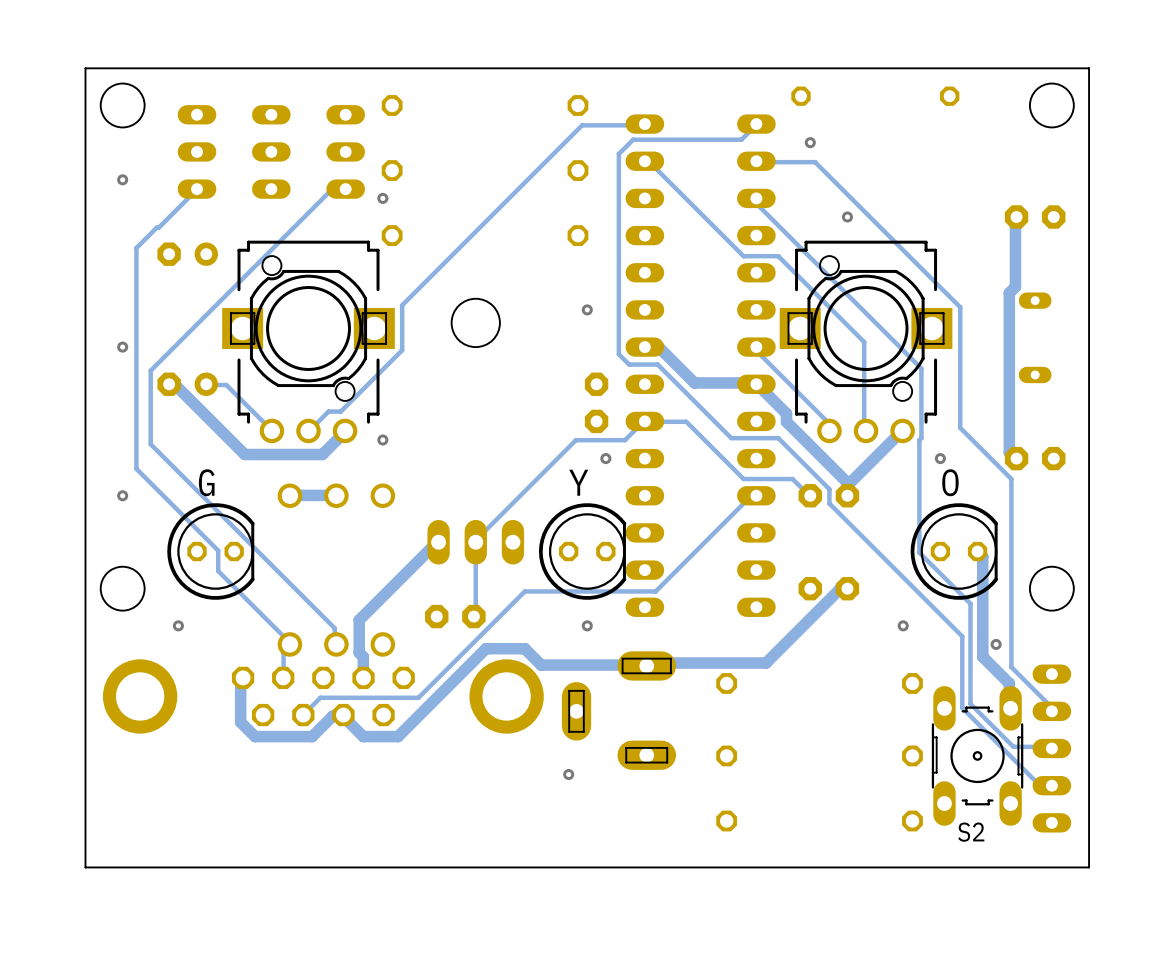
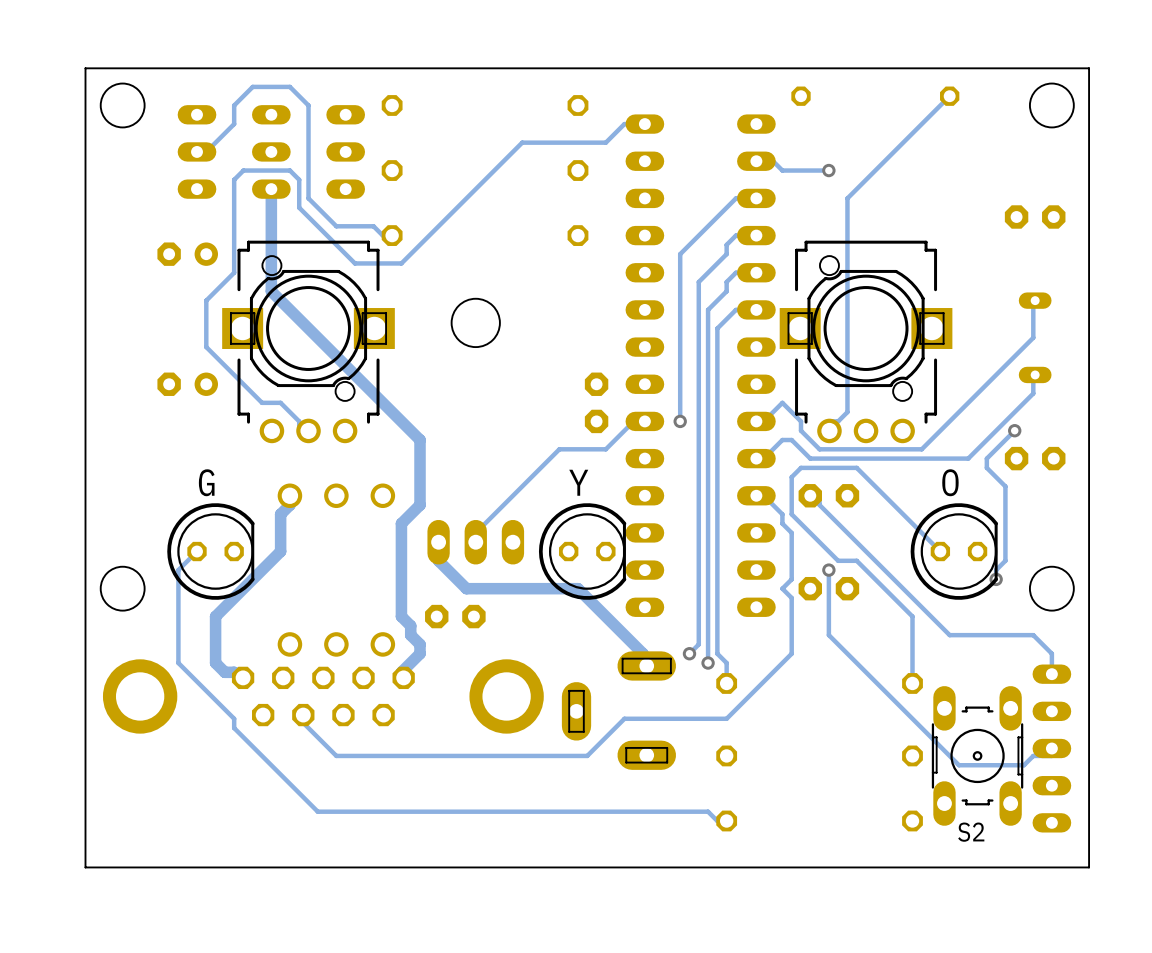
track: (644, 124) (582, 125) (402, 305) (402, 350) (340, 411) (328, 411) (308, 430) -> (644, 124) (624, 124) (605, 142) (522, 142) (401, 263) (354, 263) (299, 207) (299, 179) (289, 170) (243, 170) (234, 179) (234, 272) (206, 300) (206, 347) (262, 402) (280, 402) (299, 421) (299, 430) (308, 440) (308, 430)
track: (756, 124) (741, 139) (633, 139) (618, 153) (618, 354) (629, 364) (657, 364) (731, 438) (778, 438) (829, 489) (829, 503) (962, 636) (962, 707) (1039, 785) (1051, 785) -> none
via: (810, 142) -> none
track: none -> (197, 151) (206, 151) (234, 124) (234, 105) (252, 86) (289, 86) (308, 105) (308, 198) (336, 226) (373, 226) (382, 235) (392, 235)
track: (644, 161) (649, 162) (743, 256) (778, 256) (864, 342) (864, 429) (866, 430) -> none
track: (756, 161) (815, 162) (960, 307) (960, 427) (1011, 479) (1011, 667) (1050, 705) (1051, 711) -> (756, 161) (773, 161) (782, 170) (828, 170)
via: none -> (828, 170)
via: (122, 179) -> none
track: (197, 189) (136, 248) (136, 468) (218, 550) (218, 571) (289, 642) (289, 646) (283, 652) (283, 677) -> none
track: none -> (271, 189) (271, 291) (420, 440) (420, 505) (401, 523) (401, 616) (410, 625) (410, 635) (420, 644) (420, 653) (401, 672) (403, 677)
track: (345, 189) (344, 190) (330, 190) (150, 370) (150, 444) (334, 628) (336, 644) -> none
via: (382, 198) -> none
track: (756, 198) (757, 205) (921, 368) (919, 552) (970, 603) (970, 703) (1013, 746) (1050, 746) (1051, 748) -> (828, 570) (828, 635) (958, 765) (1024, 765) (1033, 755) (1051, 755) (1051, 748)
track: none -> (756, 198) (735, 198) (680, 254) (680, 421)
via: (847, 216) -> none
track: (1016, 216) (1015, 286) (1009, 293) (1009, 452) (1016, 458) -> none
track: none -> (756, 235) (735, 235) (726, 244) (726, 254) (698, 282) (698, 644) (689, 653)
track: none -> (756, 272) (735, 272) (726, 282) (726, 291) (708, 309) (708, 663)
track: none -> (1035, 300) (1033, 300) (1033, 337) (921, 449) (819, 449) (801, 430) (801, 421) (782, 402) (763, 421) (756, 421)
via: (587, 309) -> none
track: none -> (756, 309) (735, 309) (717, 328) (717, 653) (726, 663) (726, 683)
via: (122, 347) -> none
track: (644, 347) (659, 348) (694, 382) (755, 382) (786, 413) (786, 421) (847, 485) -> none
track: (756, 347) (757, 352) (829, 423) (829, 430) -> (949, 96) (847, 198) (847, 412) (838, 421) (828, 421) (829, 430)
track: none -> (1035, 374) (1033, 374) (1033, 393) (968, 458) (810, 458) (791, 440) (782, 440) (763, 458) (756, 458)
track: (169, 384) (175, 385) (244, 454) (322, 454) (345, 430) -> none
track: (206, 384) (226, 385) (271, 430) -> none
via: none -> (680, 421)
track: (902, 430) (847, 485) -> none
track: none -> (1014, 430) (986, 458) (986, 467) (1005, 486) (1005, 560) (996, 570) (996, 579)
via: none -> (1014, 430)
via: (382, 440) -> none
via: (605, 458) -> none
via: (940, 458) -> none
via: (122, 495) -> none
track: (336, 495) (289, 495) -> (243, 677) (234, 672) (224, 672) (215, 663) (215, 616) (280, 551) (280, 514) (289, 505) (289, 495)
track: (756, 495) (749, 497) (655, 591) (524, 591) (418, 697) (320, 697) (303, 715) -> (756, 495) (763, 495) (782, 514) (782, 523) (791, 532) (791, 579) (782, 588) (791, 597) (791, 653) (726, 718) (624, 718) (587, 755) (336, 755) (299, 718) (303, 715)
track: (810, 495) (792, 479) (743, 479) (686, 421) (644, 421) (625, 440) (575, 440) (475, 540) -> (644, 421) (633, 421) (605, 449) (559, 449) (475, 532) (475, 540)
track: none -> (810, 495) (819, 495) (819, 505) (949, 635) (1033, 635) (1051, 653) (1051, 674)
track: (438, 542) (359, 620) (359, 652) (363, 656) (363, 677) -> (438, 542) (438, 560) (466, 588) (577, 588) (643, 653) (643, 663) (646, 665)
track: (475, 542) (475, 616) (473, 616) -> none
track: none -> (197, 551) (178, 570) (178, 663) (234, 718) (234, 728) (317, 811) (708, 811) (717, 820) (726, 820)
track: none -> (940, 551) (856, 467) (801, 467) (791, 477) (791, 514) (838, 560) (856, 560) (912, 616) (912, 683)
track: (977, 551) (982, 556) (982, 656) (1009, 683) (1010, 708) -> none
via: none -> (828, 570)
via: none -> (996, 579)
track: (847, 588) (839, 589) (766, 663) (649, 663) (646, 665) (541, 665) (524, 648) (485, 648) (398, 736) (363, 736) (343, 715) (332, 716) (312, 736) (254, 736) (240, 722) (240, 681) (243, 677) -> none
via: (178, 625) -> none
via: (587, 625) -> none
via: (903, 625) -> none
via: (996, 644) -> none
via: none -> (689, 653)
via: none -> (708, 663)
via: (568, 774) -> none

